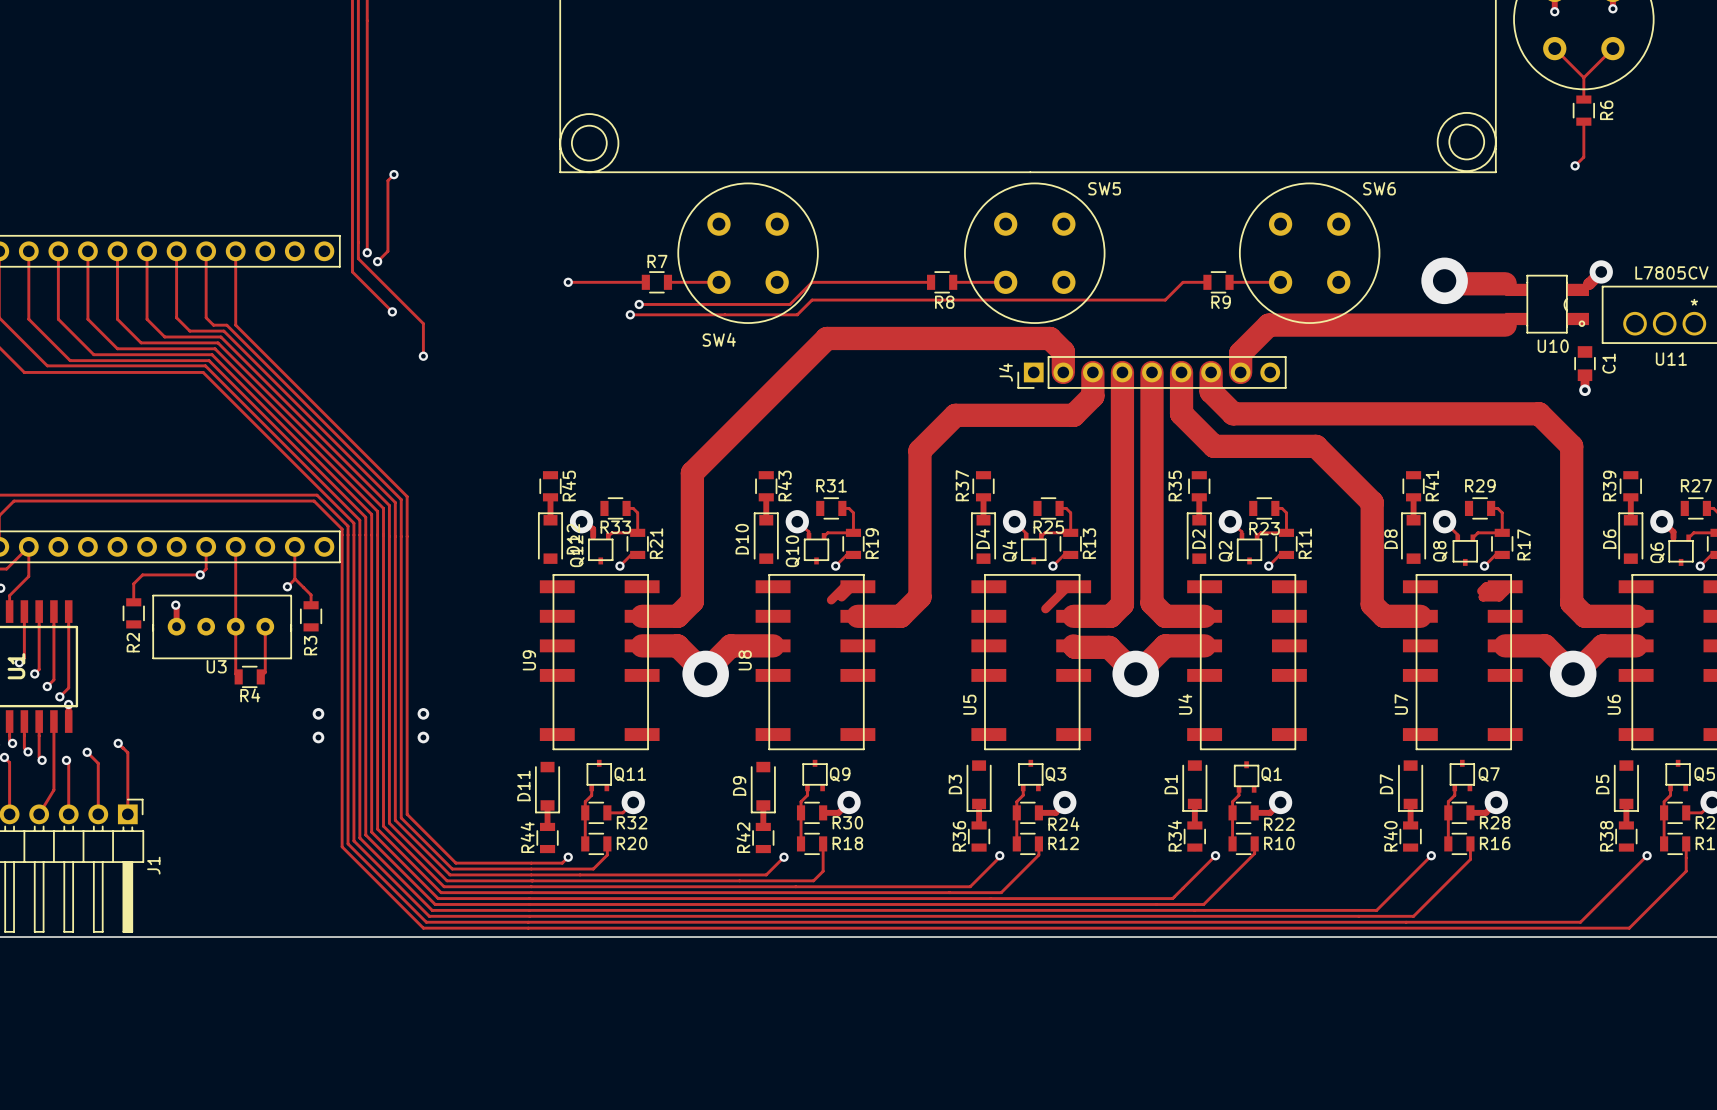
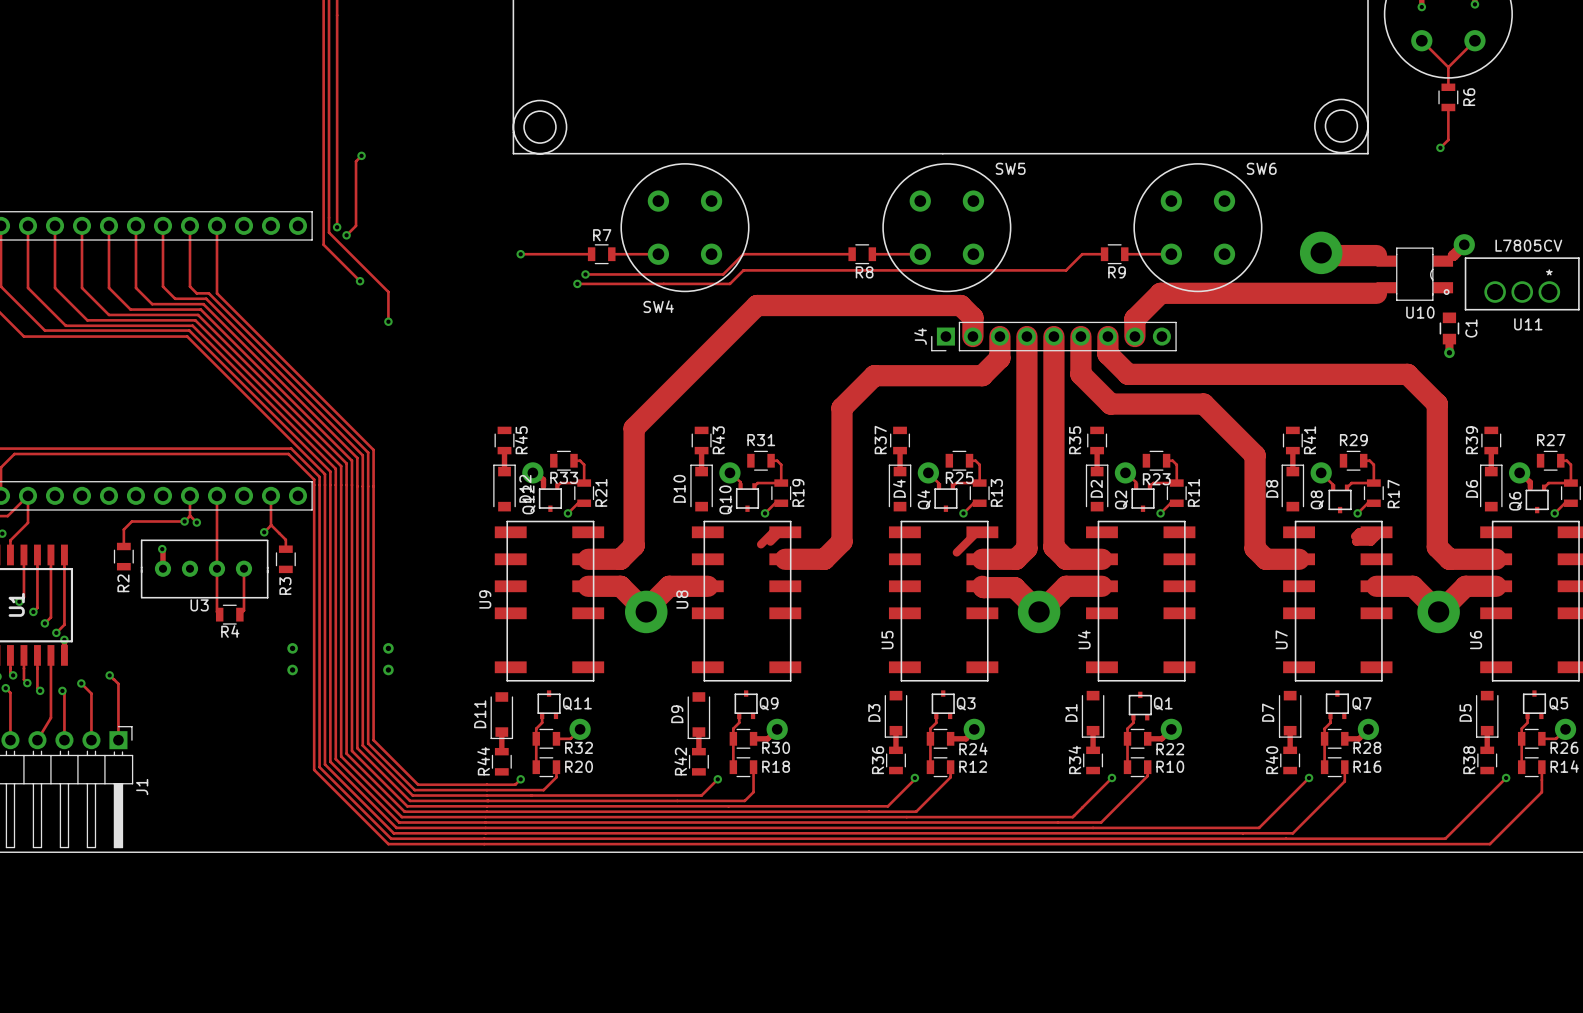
track: none -> (189, 516) (196, 522)
via: none -> (196, 522)

